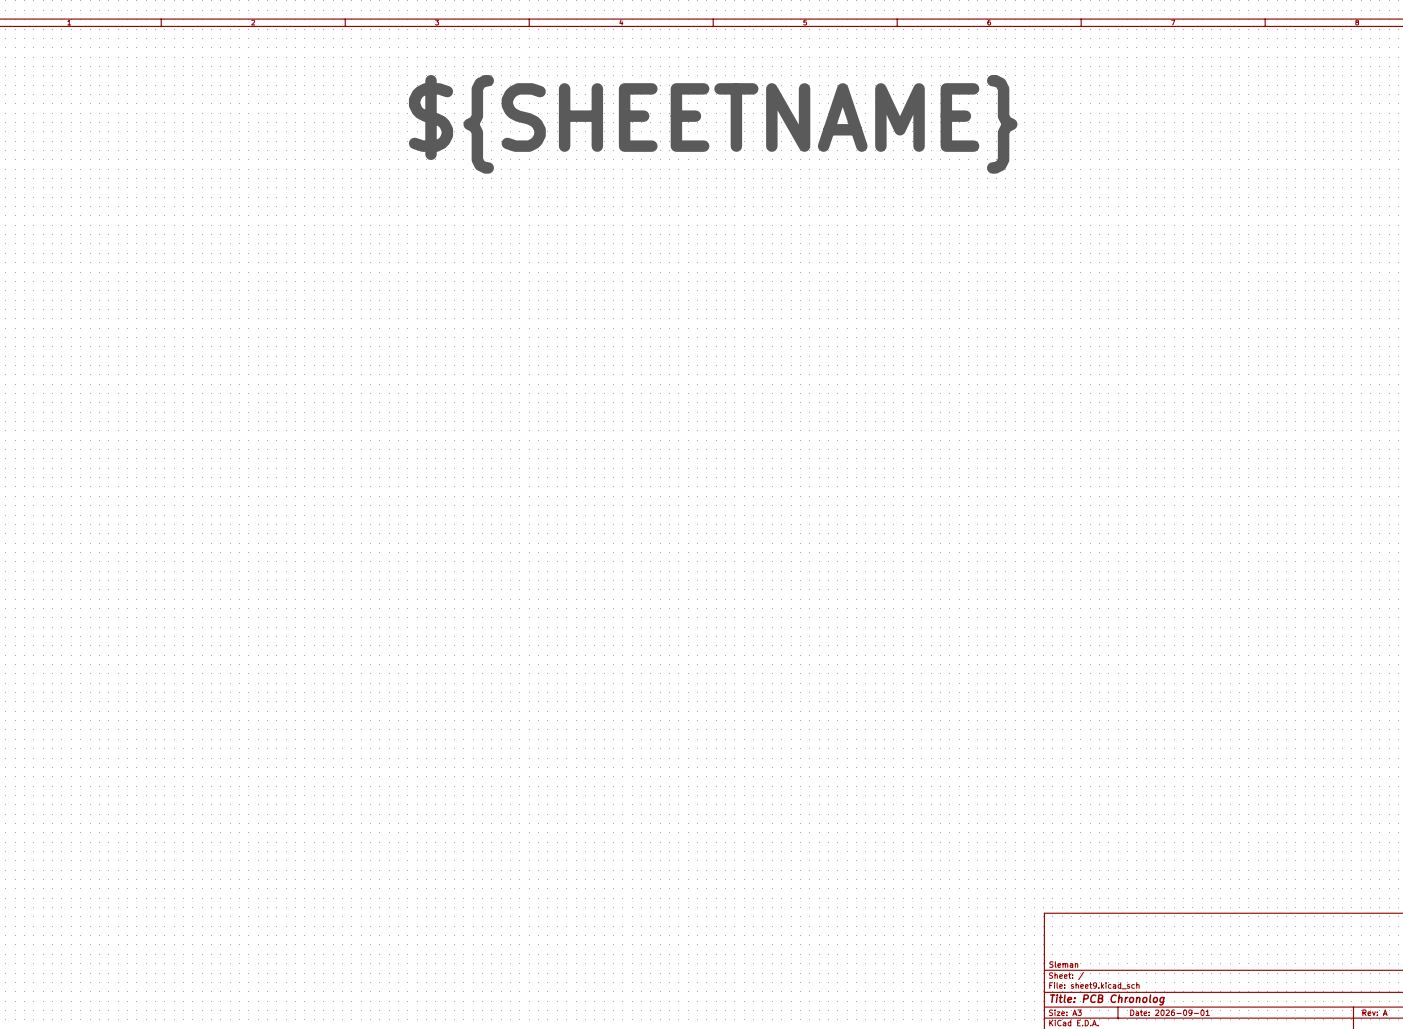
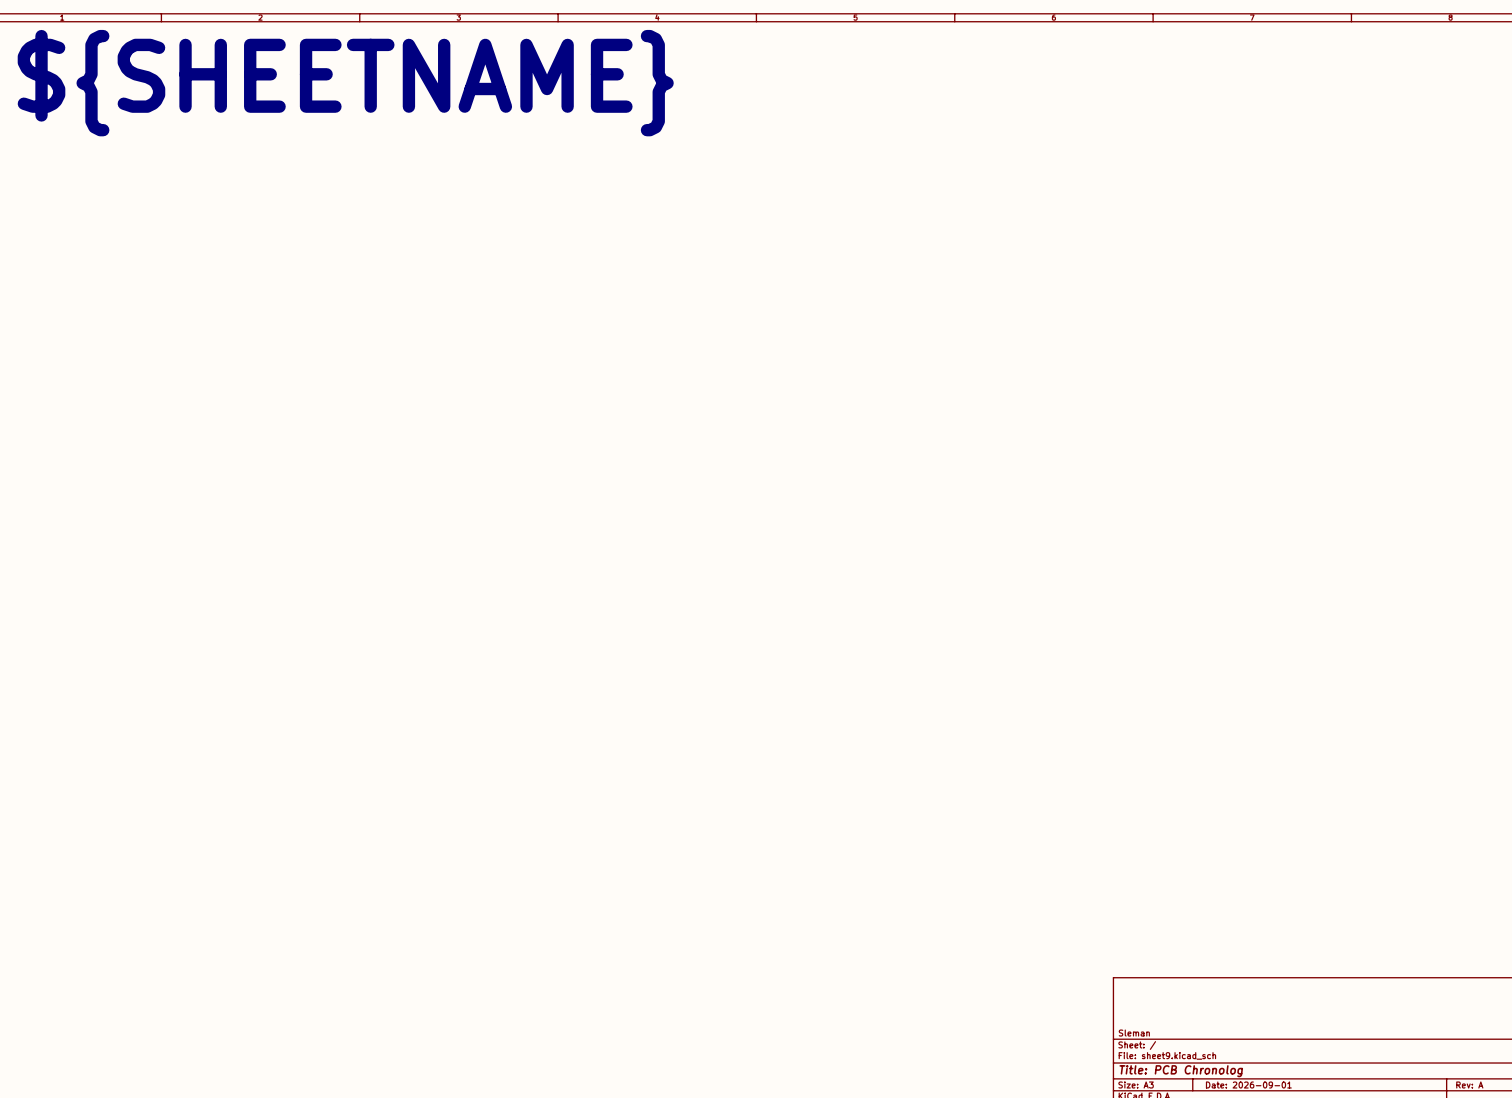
text: none -> ${SHEETNAME} (345, 83)
text: ${SHEETNAME} (713, 124) -> none

